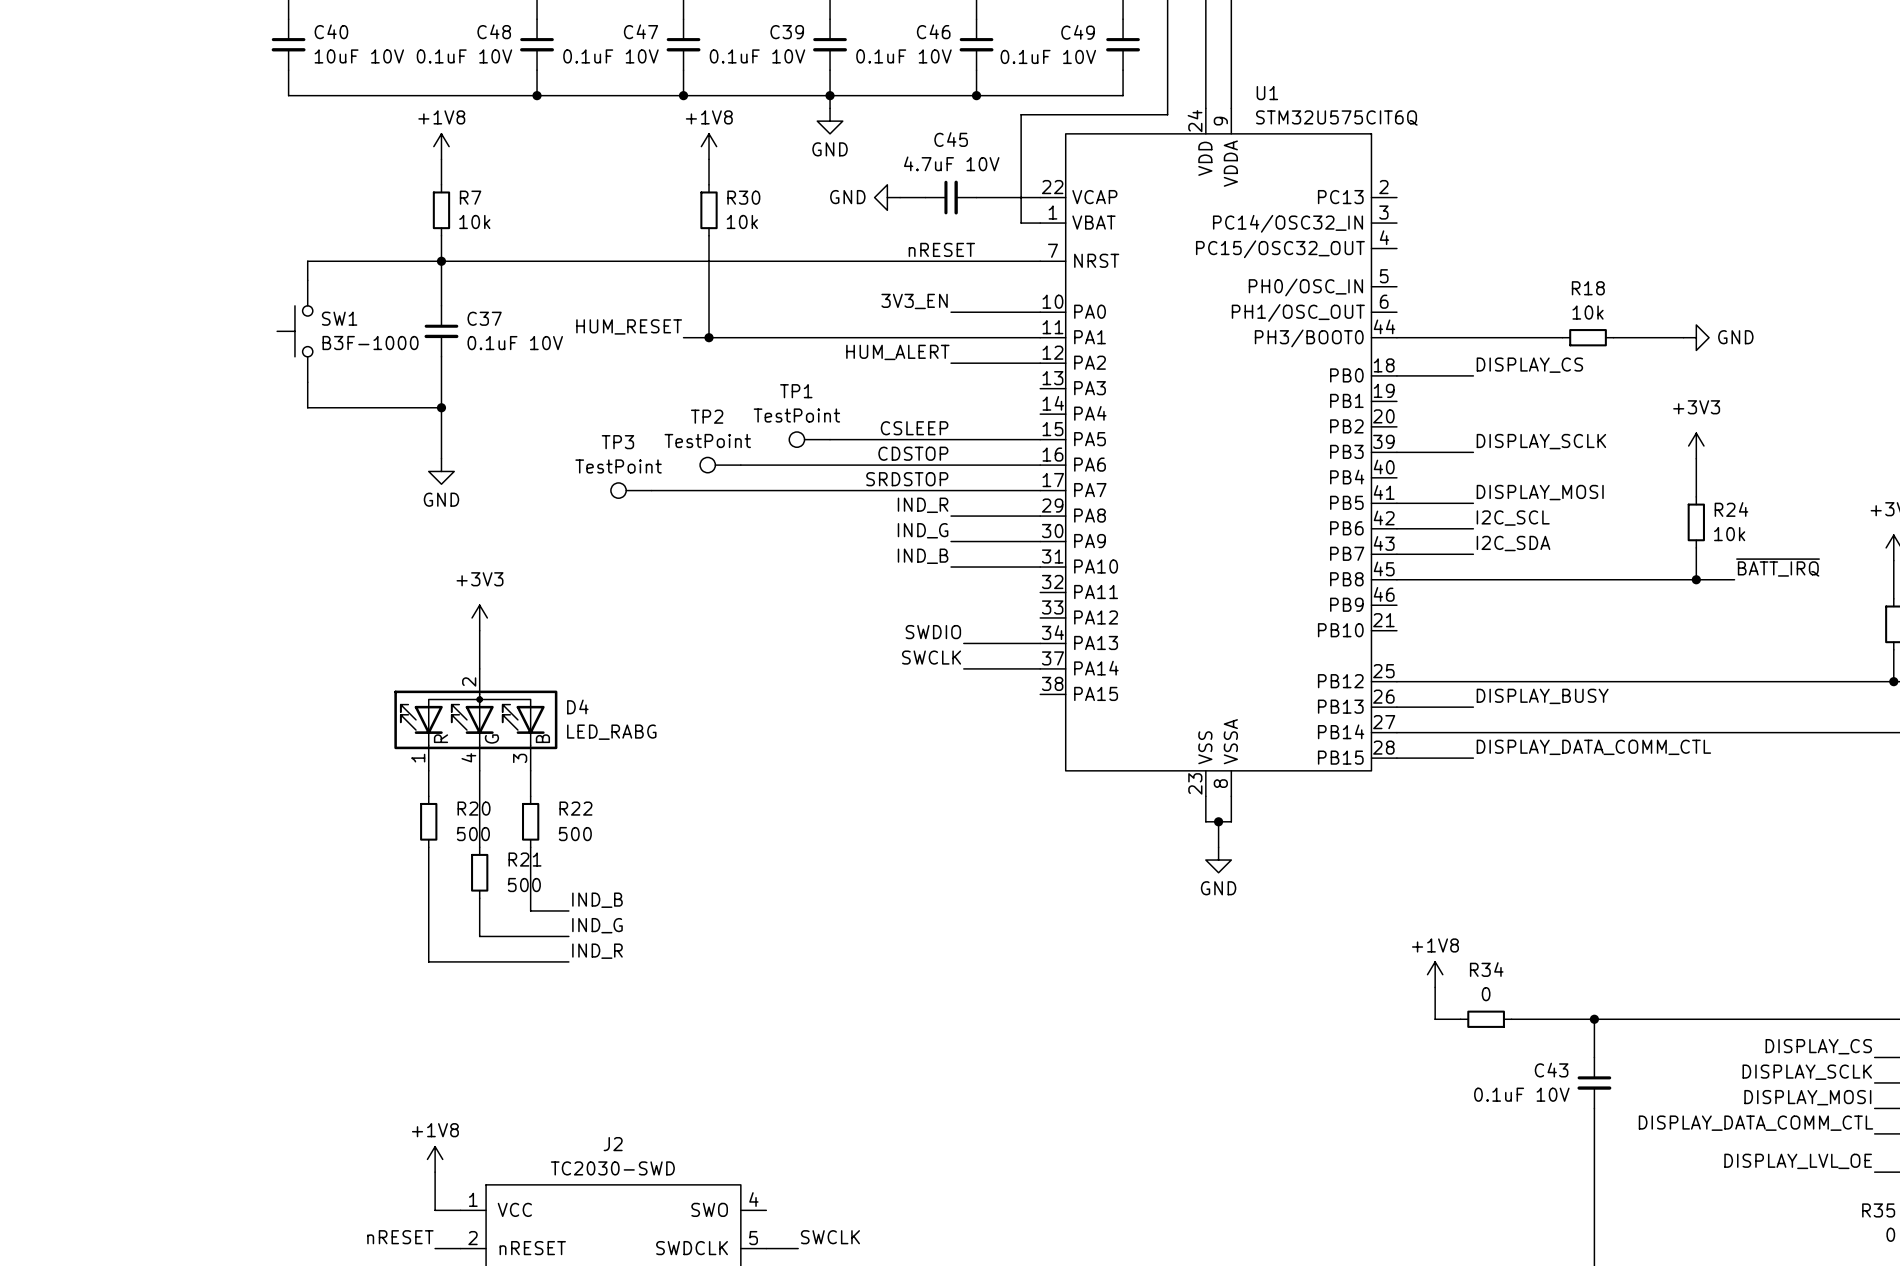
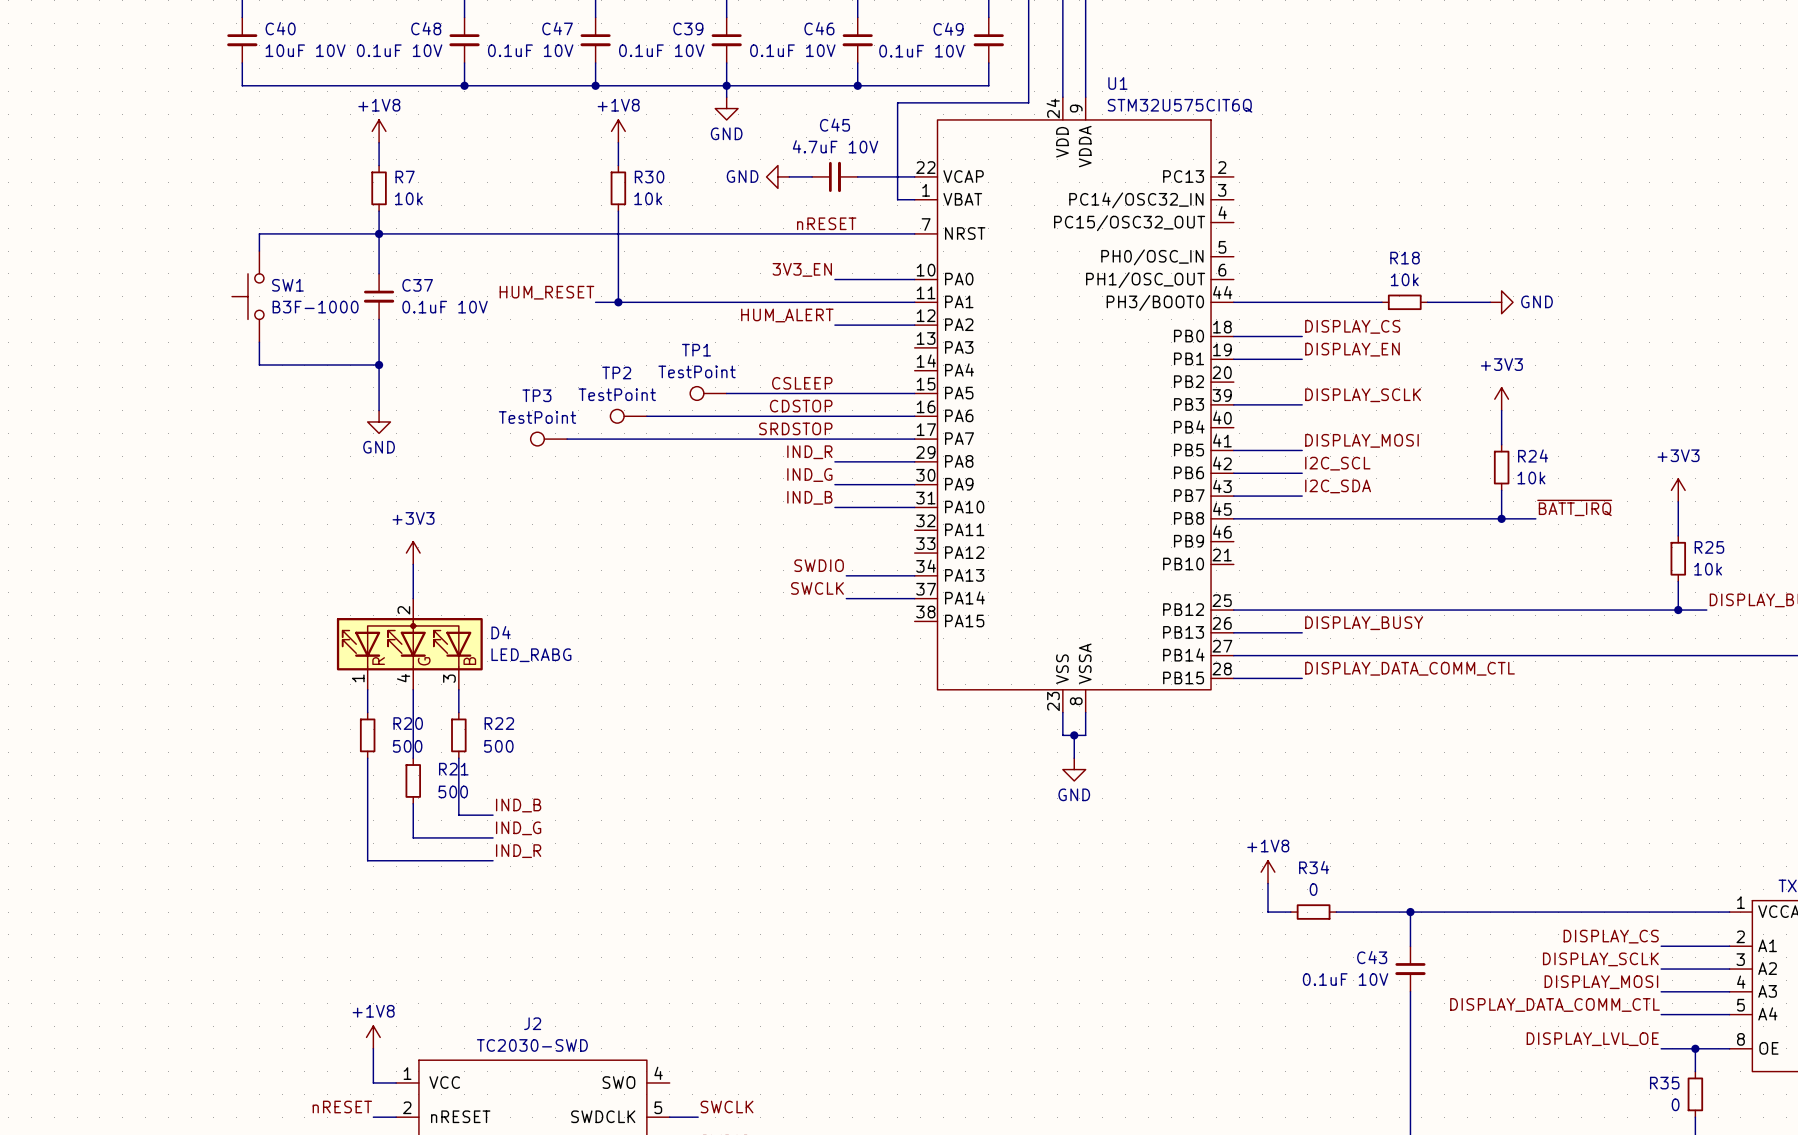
label: none -> DISPLAY_EN (1352, 349)
wire: none -> (1233, 359) (1302, 359)

